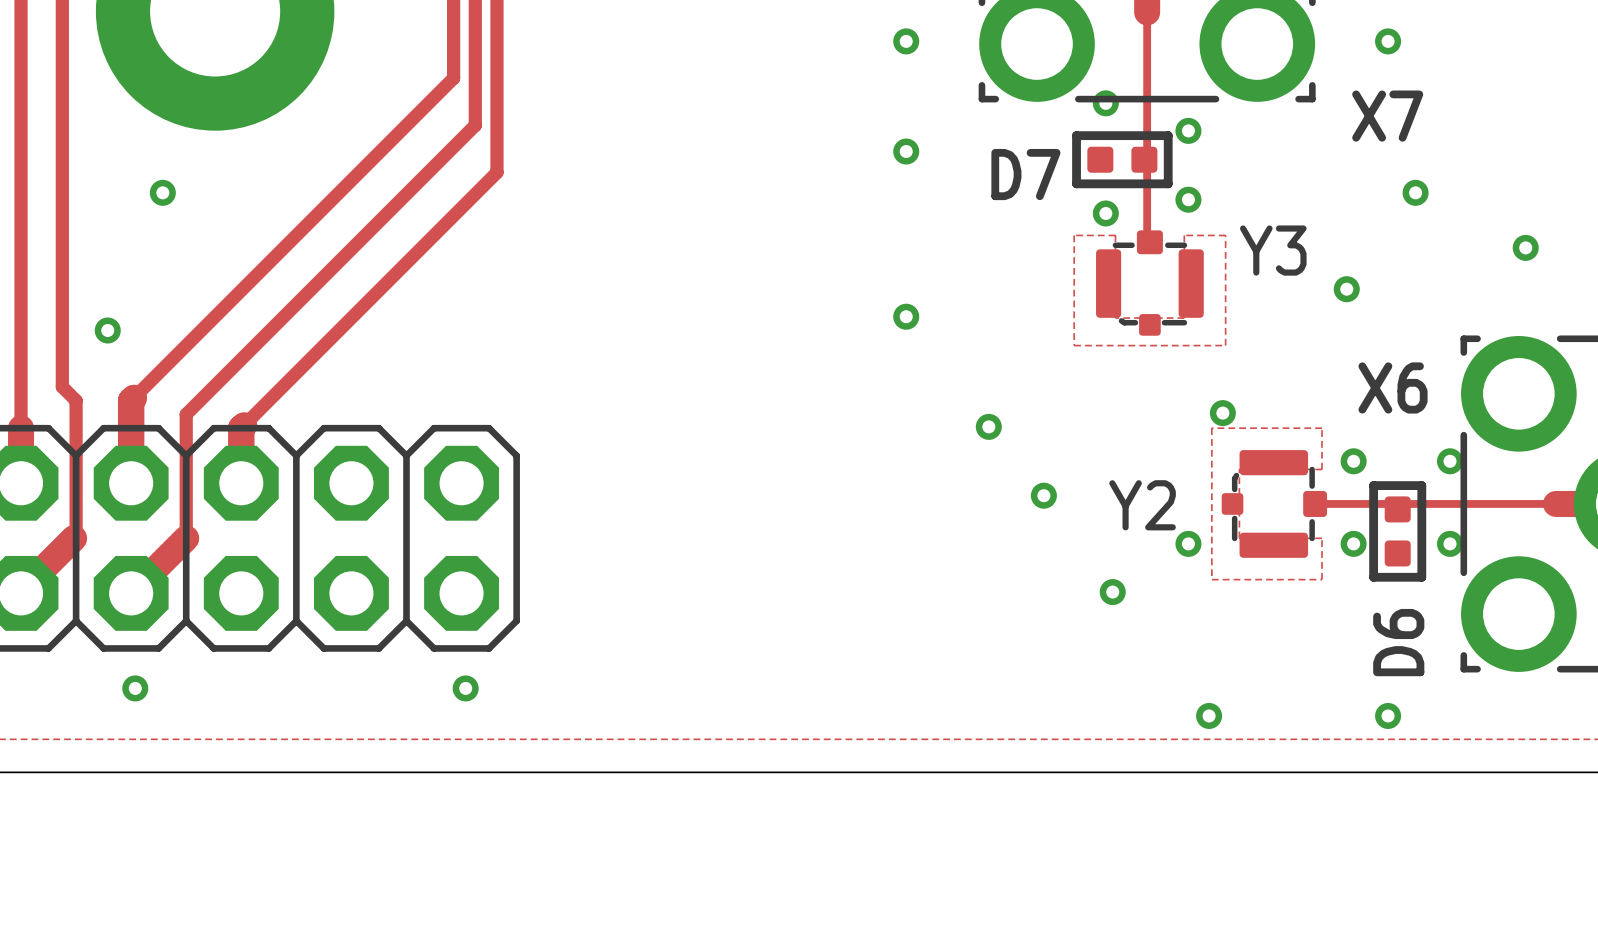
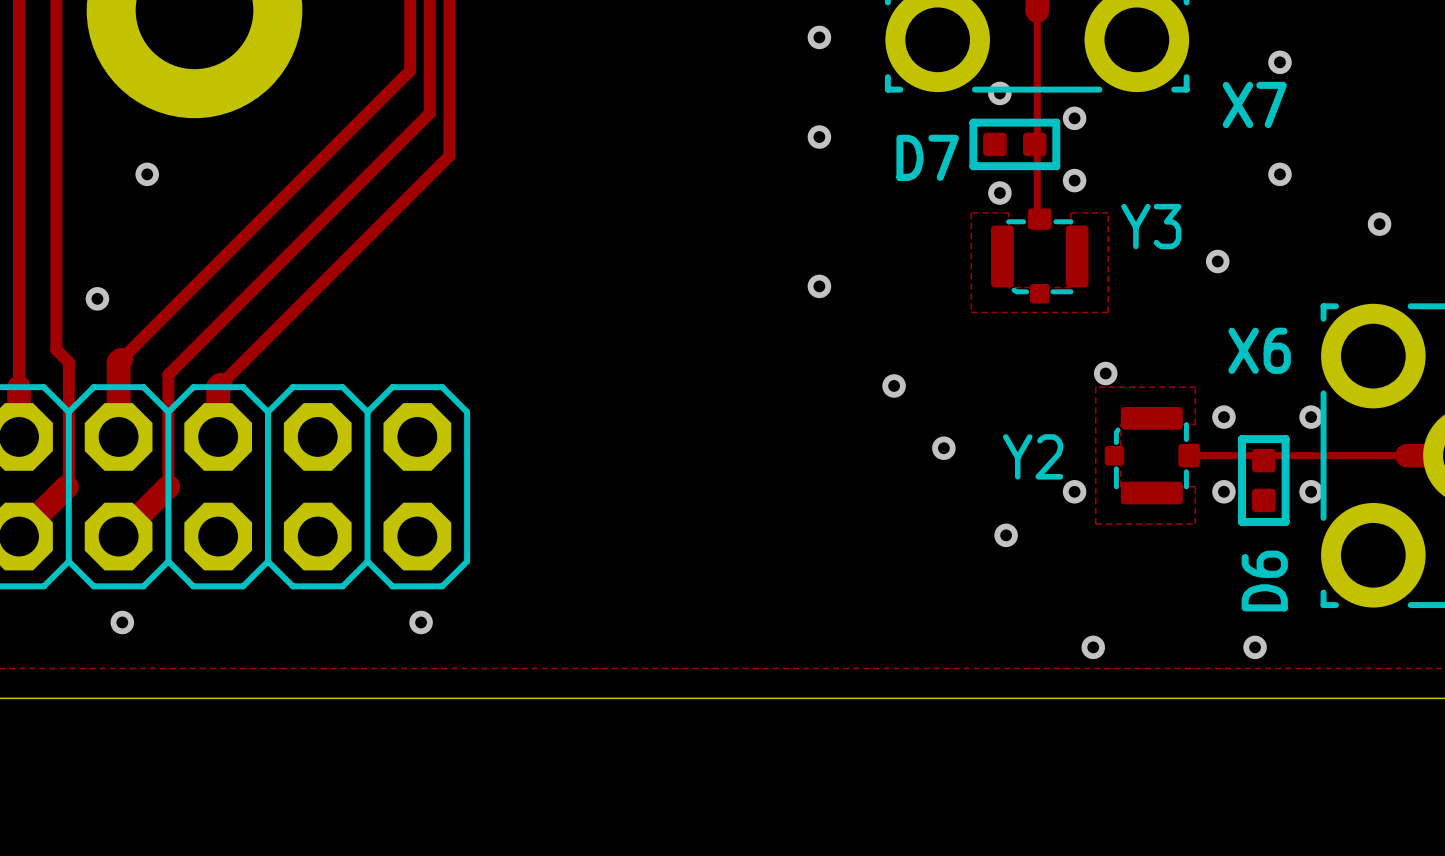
via position: (1388, 41) -> (1279, 62)

